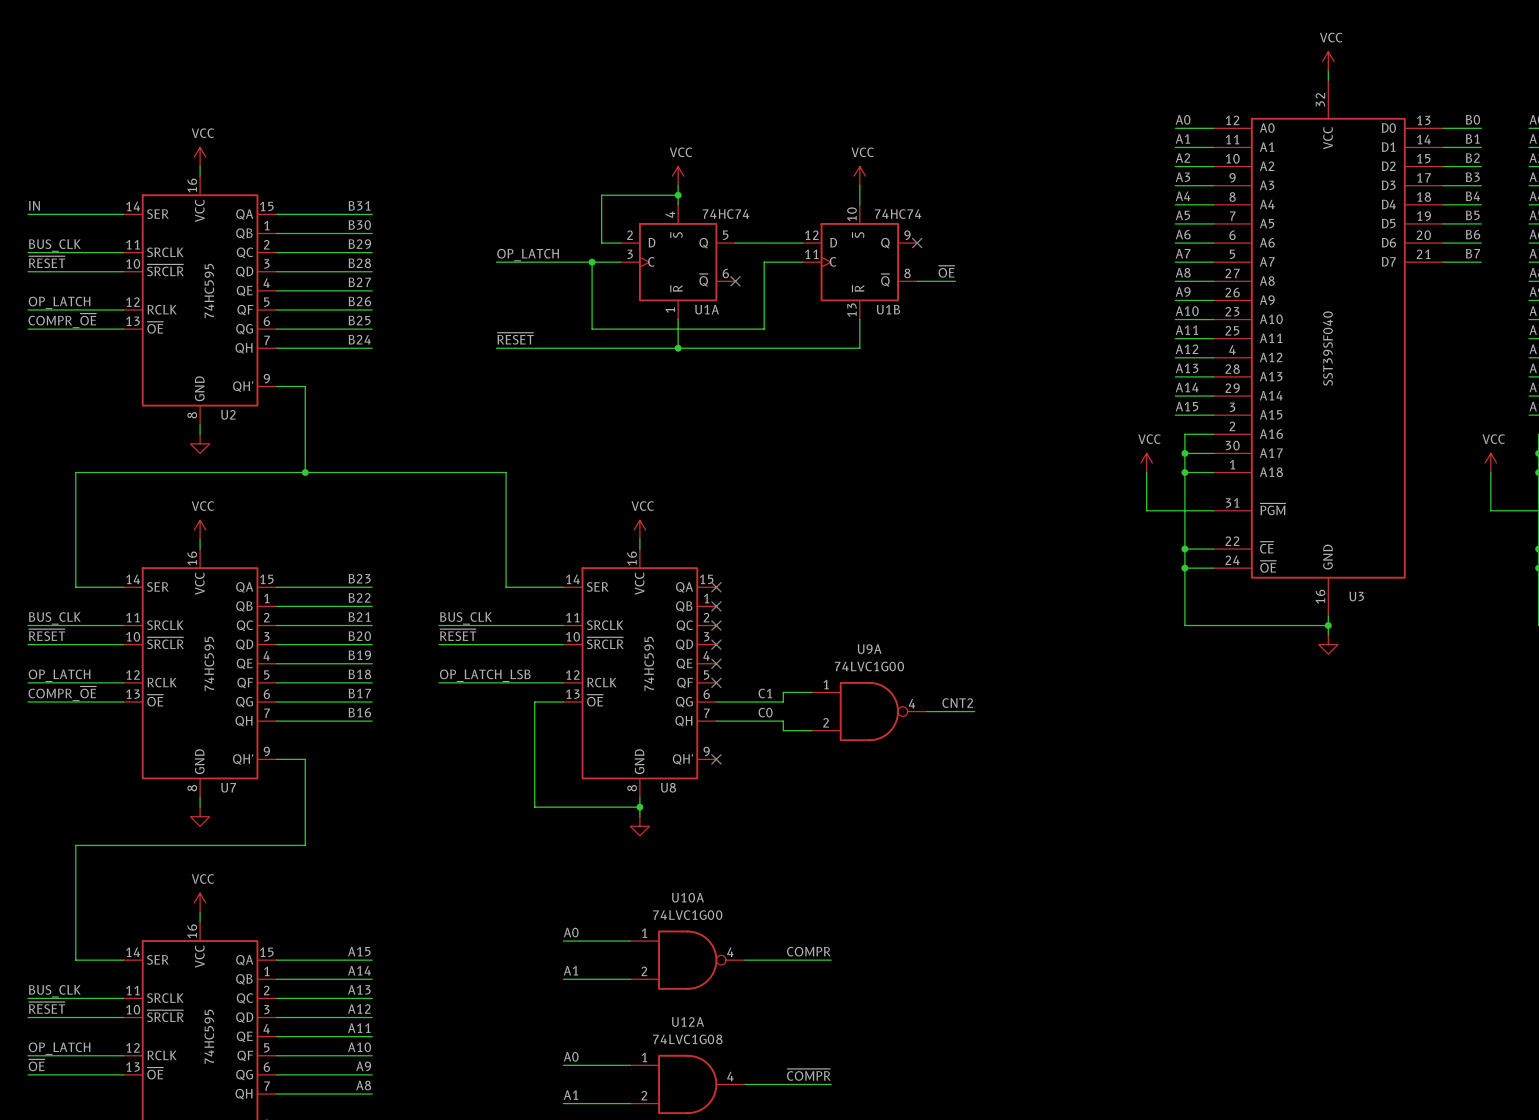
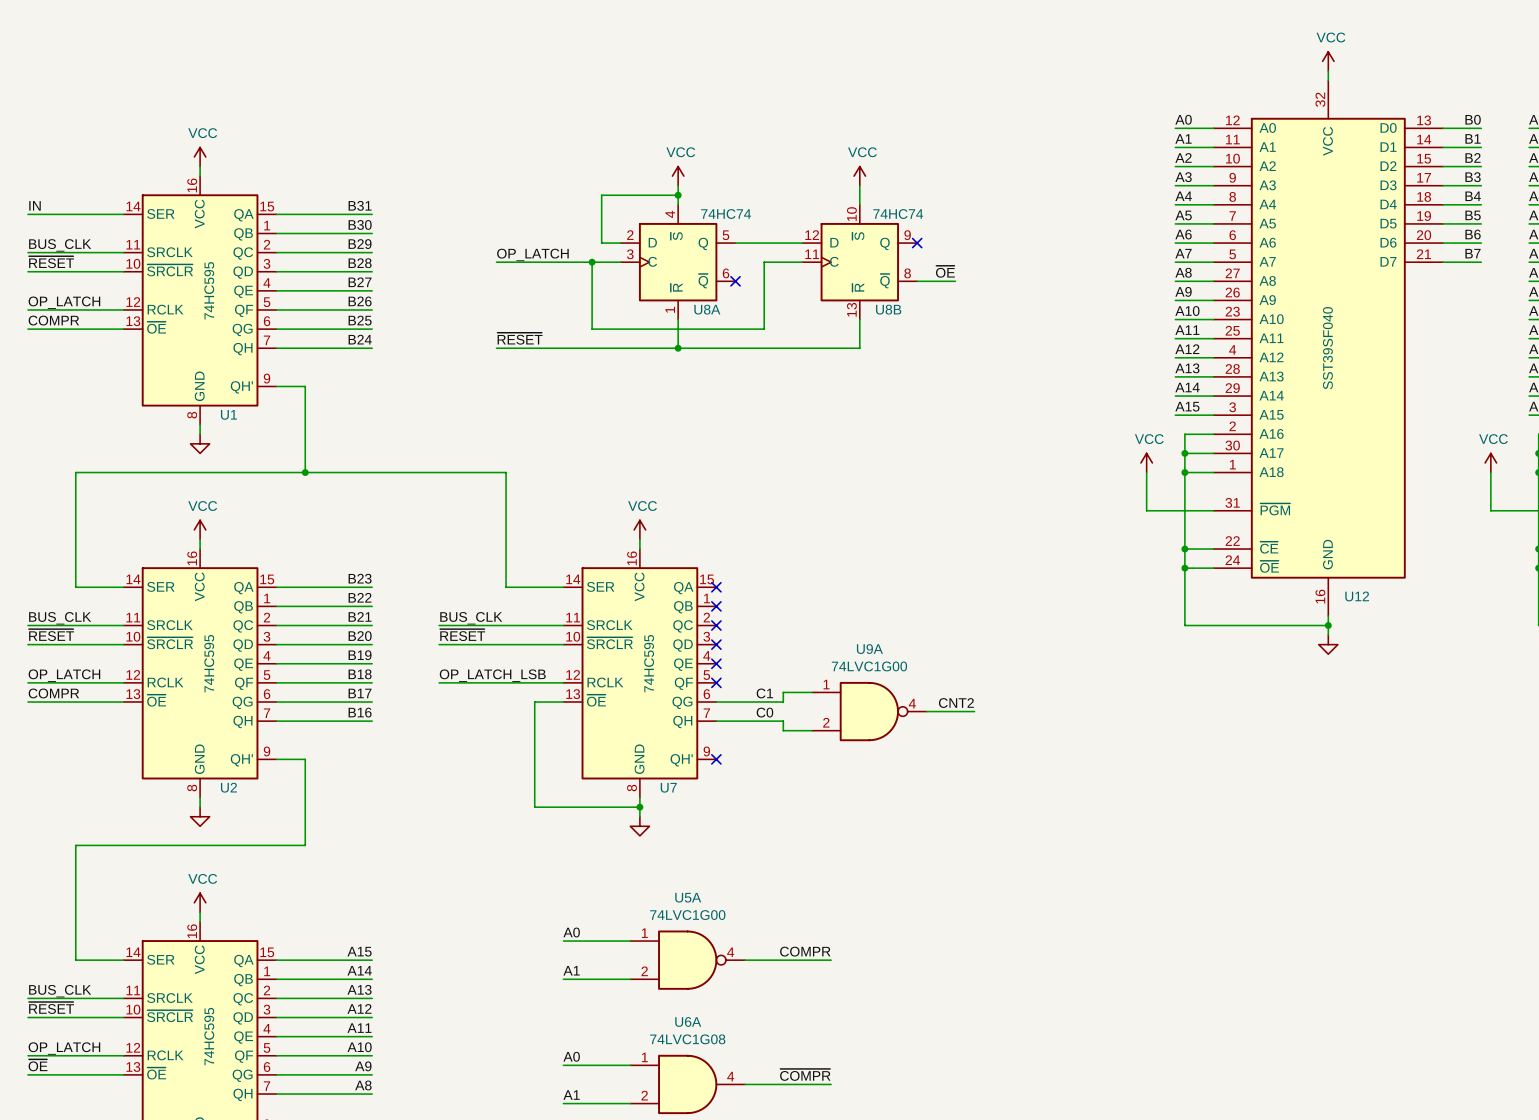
U1A name: U1A (707, 309) -> U8A (707, 309)
U1B name: U1B (888, 309) -> U8B (888, 309)
label: COMPR_~{OE} (62, 320) -> COMPR (53, 320)
U2 name: U2 (228, 414) -> U1 (228, 414)
U3 name: U3 (1356, 596) -> U12 (1357, 596)
label: COMPR_~{OE} (62, 693) -> COMPR (53, 693)
U7 name: U7 (228, 787) -> U2 (228, 787)
U8 name: U8 (668, 787) -> U7 (668, 787)
U10A name: U10A (687, 897) -> U5A (688, 897)
U12A name: U12A (687, 1022) -> U6A (688, 1021)

